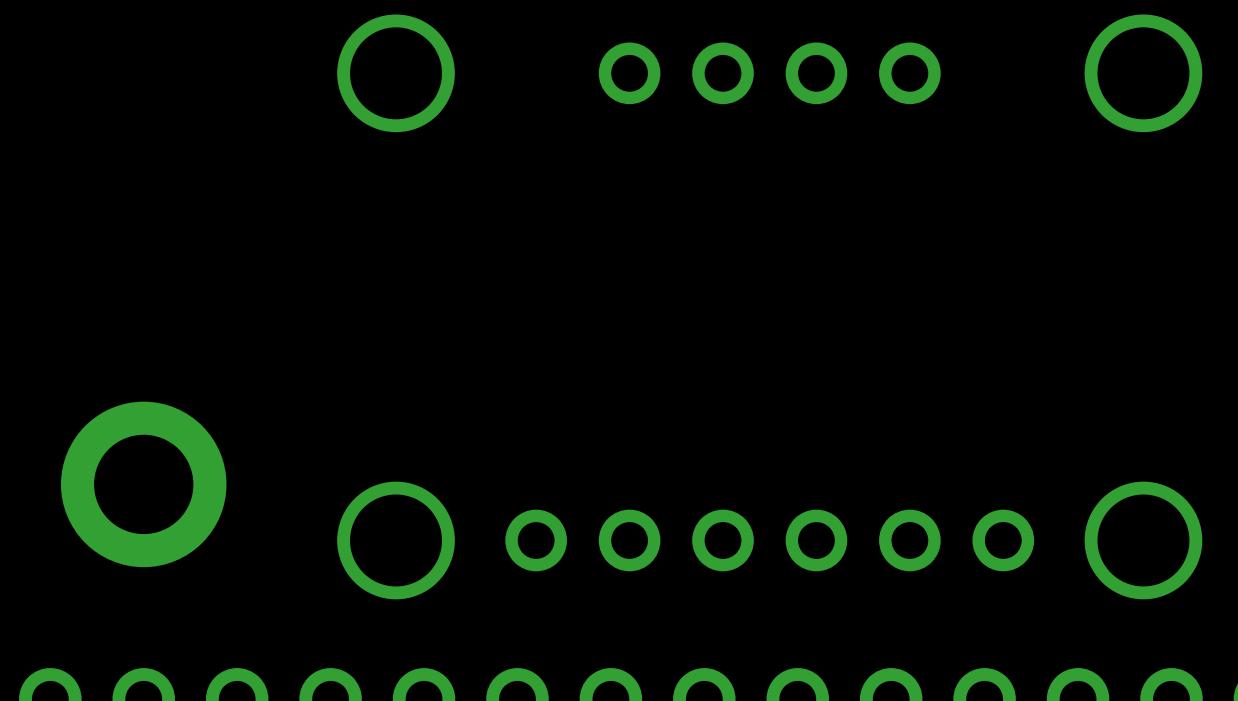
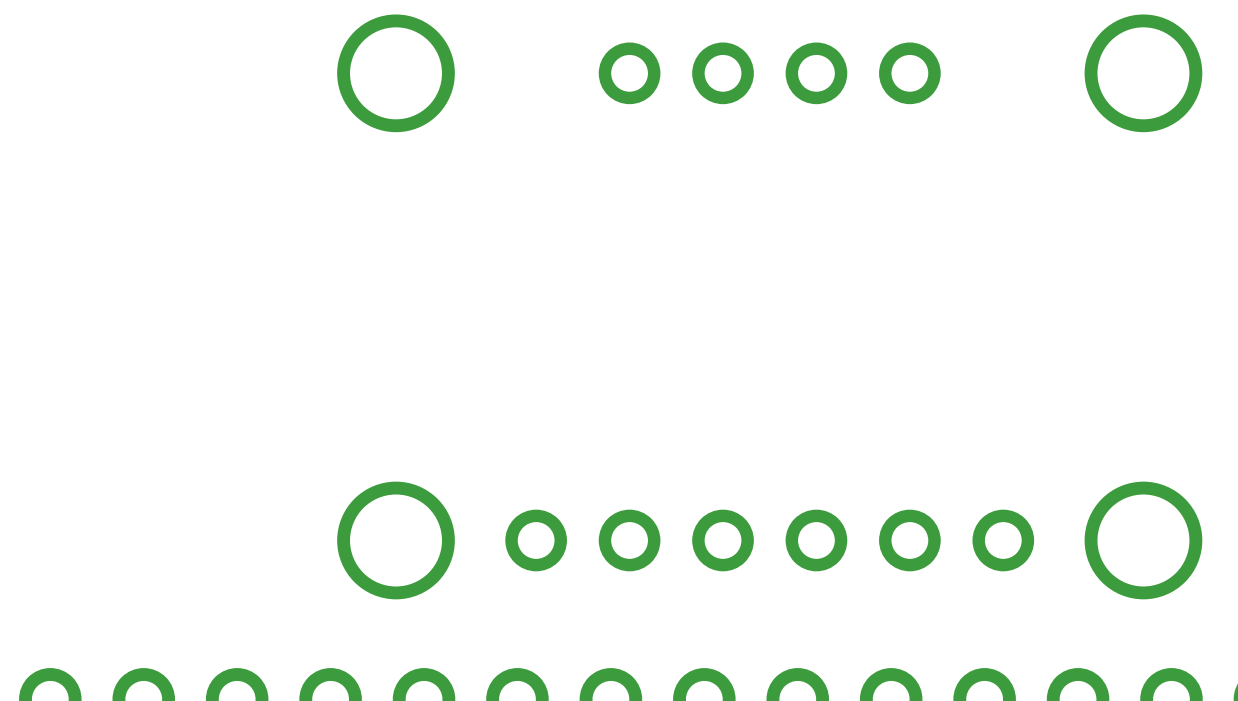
part: (143, 484) -> none

